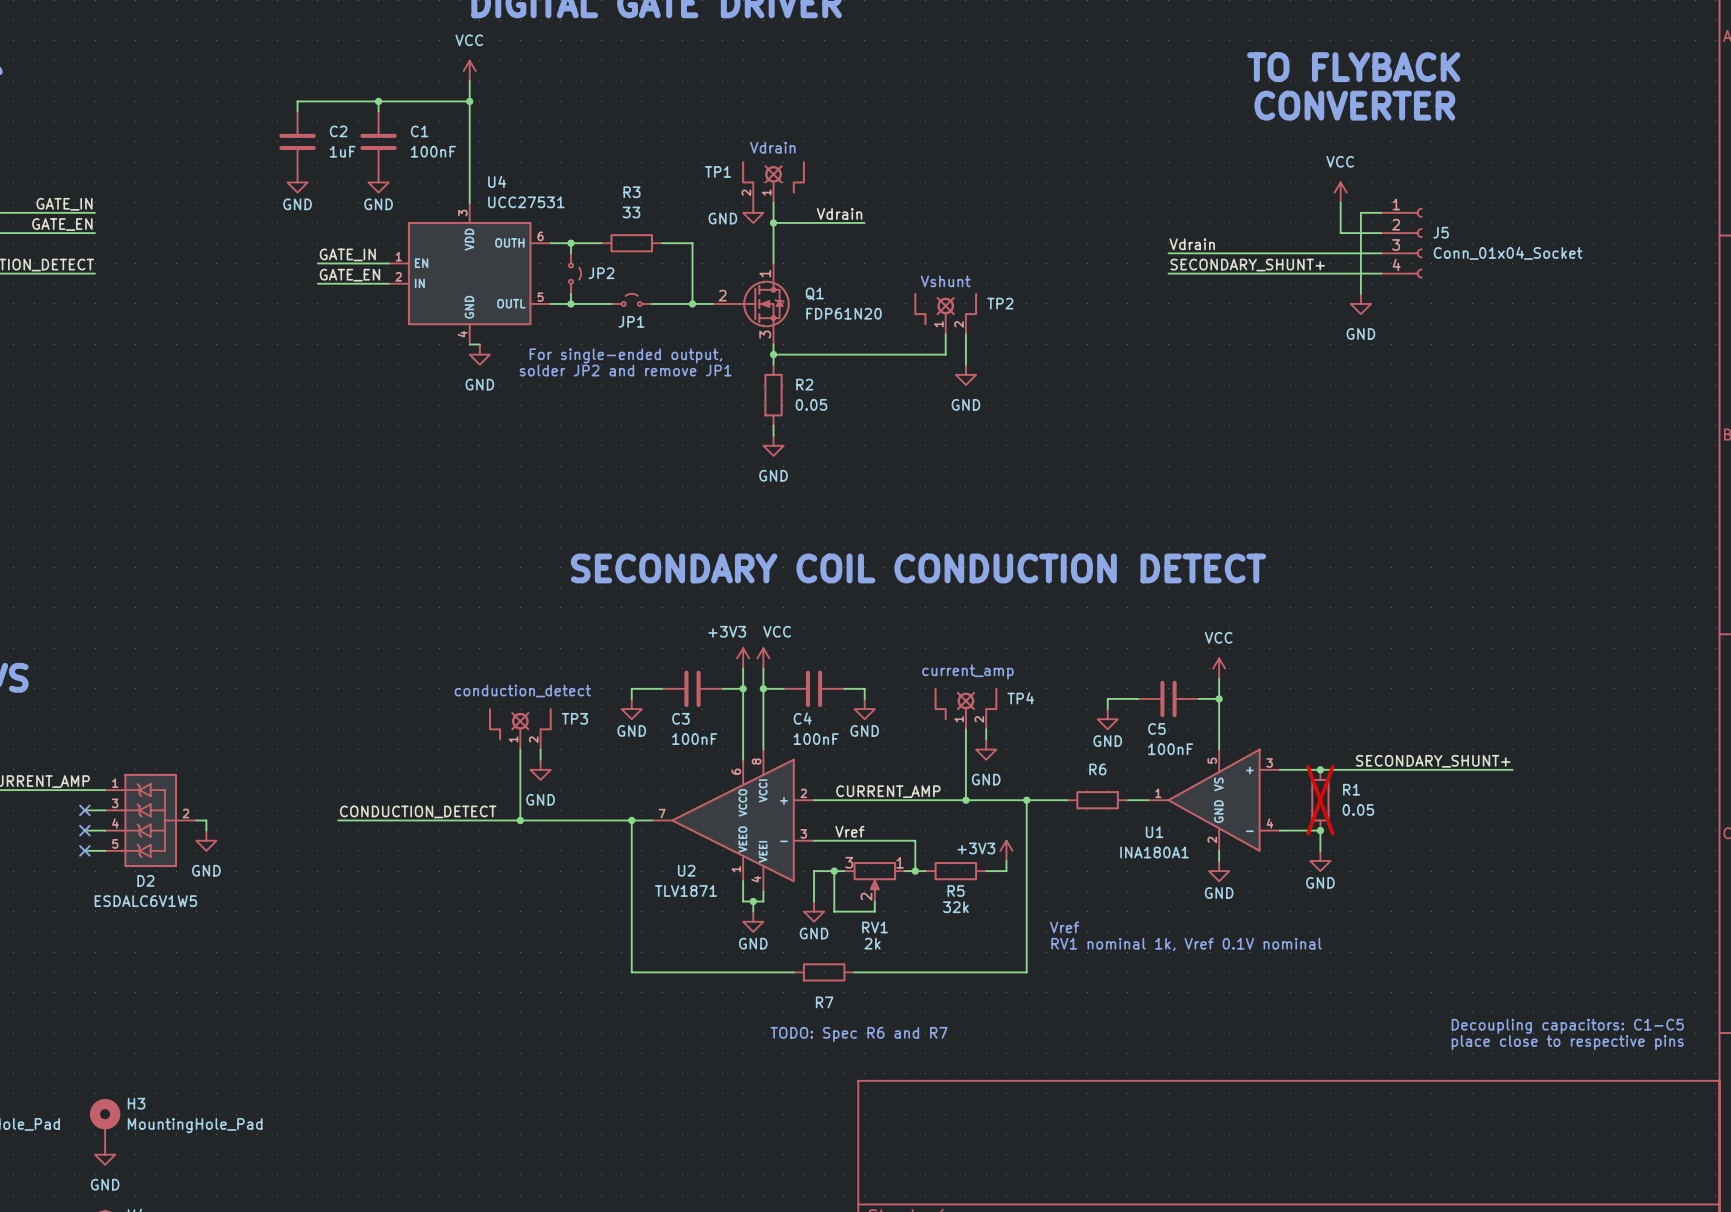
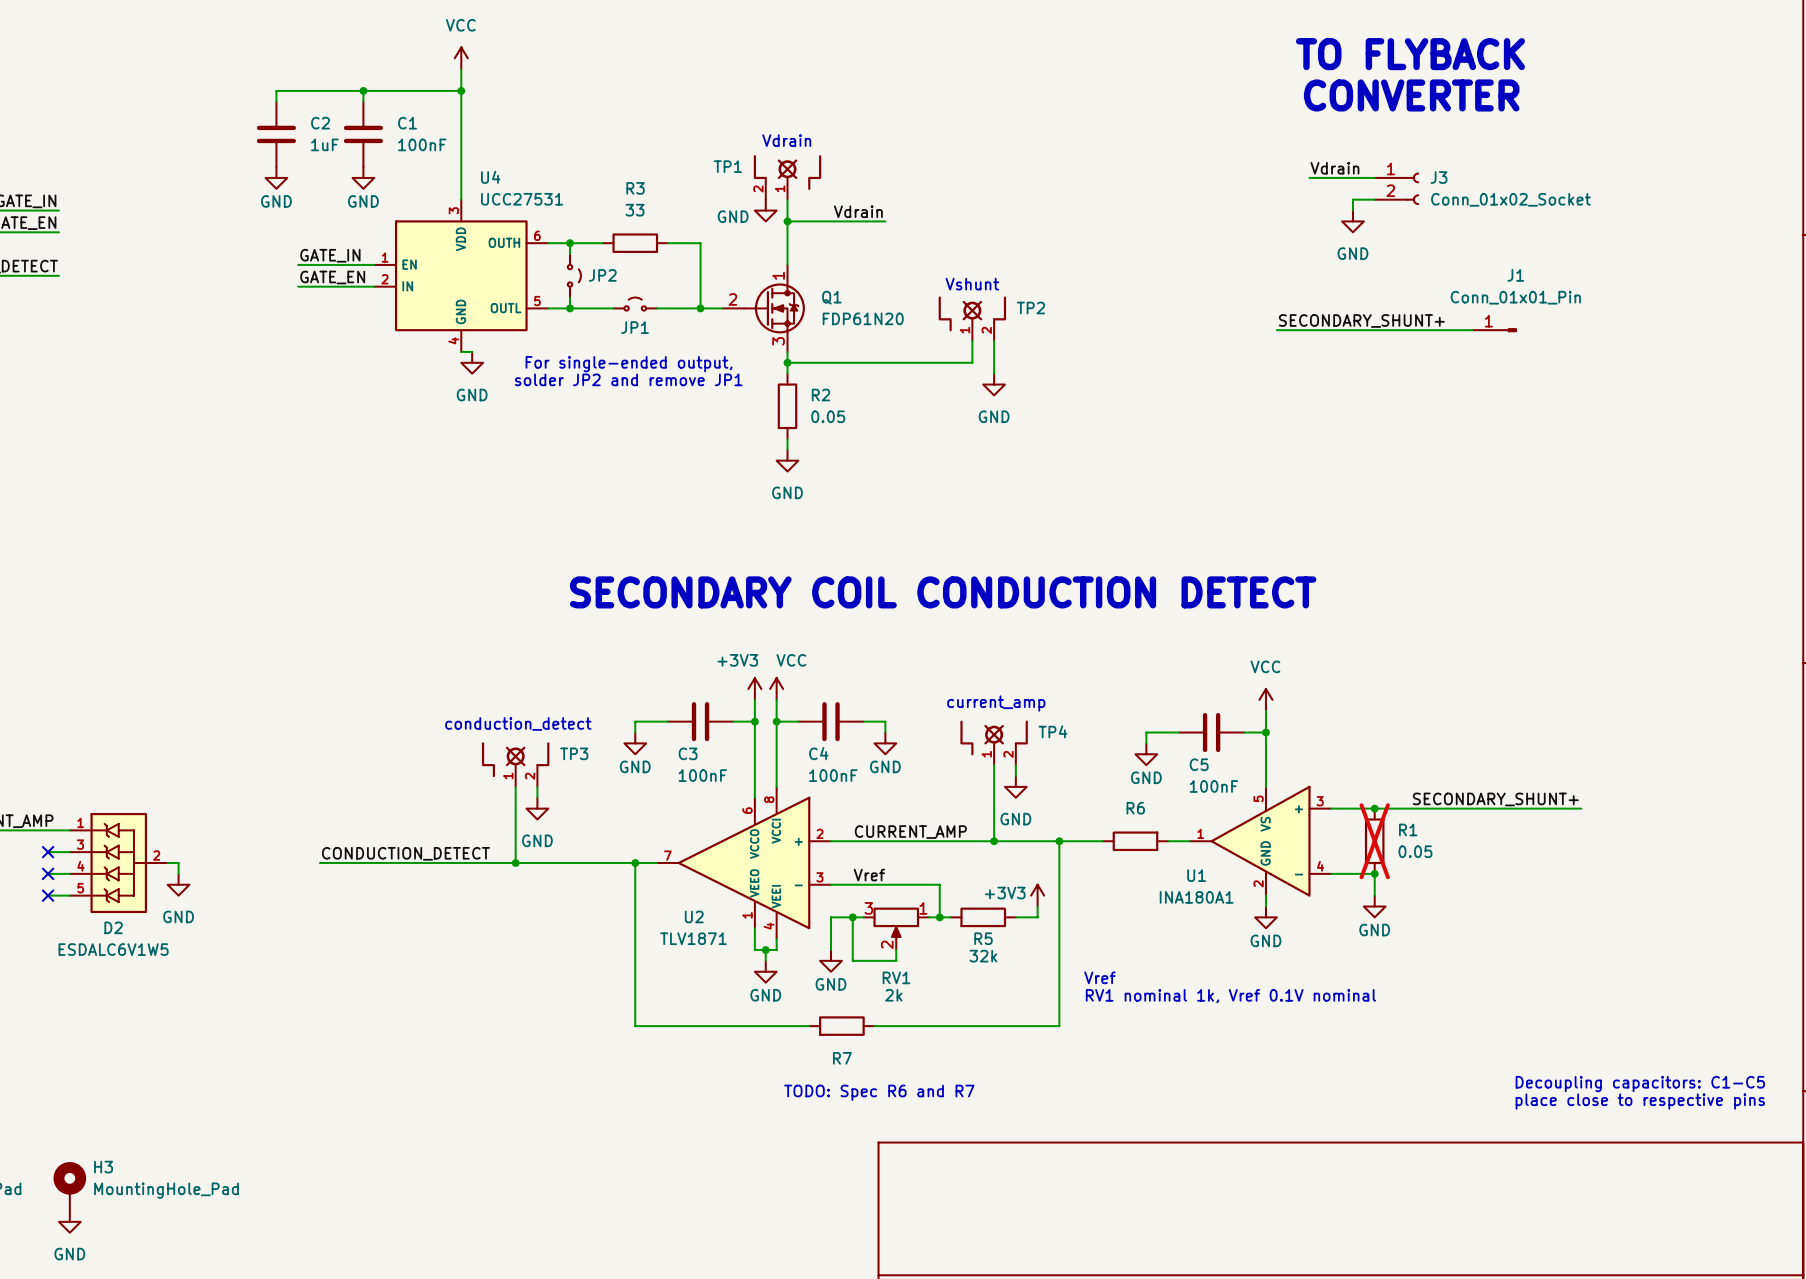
wire: none -> (1309, 177) (1374, 177)
power symbol: VCC (1340, 192) -> none
J3: none -> Conn_01x02_Socket (1396, 188)
wire: none -> (1374, 199) (1352, 199) (1352, 210)
wire: (1340, 202) (1340, 233) (1381, 233) -> none
wire: (1381, 212) (1360, 212) (1360, 293) -> none
J5: Conn_01x04_Socket (1401, 243) -> none
label position: Vdrain (1192, 244) -> Vdrain (1334, 168)
wire: (1168, 253) (1381, 253) -> none
label position: SECONDARY_SHUNT+ (1247, 265) -> SECONDARY_SHUNT+ (1361, 320)
wire: (1168, 273) (1381, 273) -> none
power symbol position: GND (1360, 303) -> GND (1352, 221)
wire: none -> (1276, 330) (1472, 330)
J1: none -> Conn_01x01_Pin (1494, 330)

